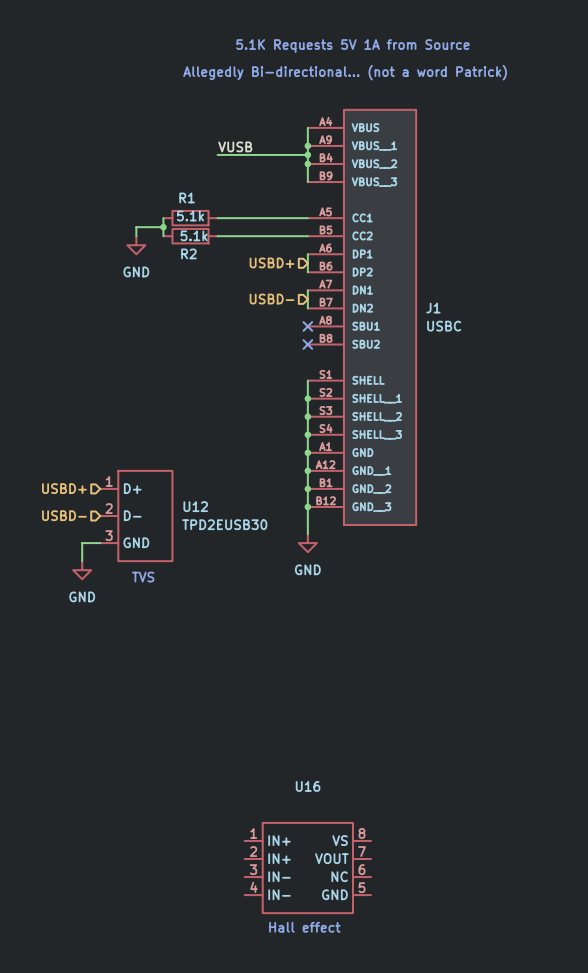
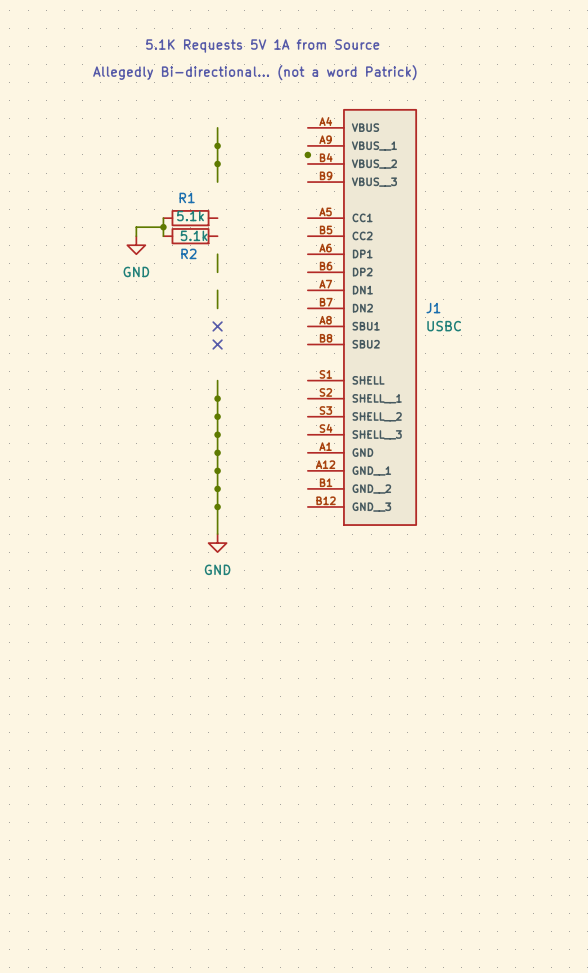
text position: 5.1K Requests 5V 1A from Source (352, 46) -> 5.1K Requests 5V 1A from Source (262, 46)
text position: Allegedly Bi-directional... (not a word Patrick) (345, 72) -> Allegedly Bi-directional... (not a word Patrick) (254, 72)
wire: (307, 127) (307, 182) -> (217, 127) (217, 182)
junction: none -> (217, 145)
junction: (307, 145) -> none
label: VUSB (235, 146) -> none
wire: (217, 154) (307, 154) -> none
junction: none -> (217, 163)
junction: (307, 163) -> none
wire: (217, 218) (307, 218) -> none
wire: (217, 236) (307, 236) -> none
wire: (307, 254) (307, 272) -> (217, 254) (217, 272)
hierarchical label: USBD+ (272, 262) -> none
wire: (307, 290) (307, 308) -> (217, 290) (217, 308)
hierarchical label: USBD- (272, 299) -> none
no-connect mark: none -> (217, 326)
no-connect mark: (307, 326) -> none
no-connect mark: none -> (217, 344)
no-connect mark: (307, 344) -> none
wire: (307, 380) (307, 534) -> (217, 380) (217, 534)
junction: none -> (217, 398)
junction: (307, 398) -> none
junction: none -> (217, 416)
junction: (307, 416) -> none
junction: none -> (217, 434)
junction: (307, 434) -> none
junction: none -> (217, 452)
junction: (307, 452) -> none
junction: none -> (217, 470)
junction: (307, 470) -> none
hierarchical label: USBD+ (64, 488) -> none
junction: none -> (217, 488)
junction: (307, 488) -> none
junction: none -> (217, 506)
junction: (307, 506) -> none
hierarchical label: USBD- (64, 515) -> none
U12: TPD2EUSB30 (136, 516) -> none
wire: (100, 543) (82, 543) (82, 561) -> none
power symbol: none -> GND (217, 543)
power symbol: GND (307, 543) -> none
power symbol: GND (82, 570) -> none
text: TVS (143, 577) -> none
U16: (307, 868) -> none
text: Hall effect (304, 927) -> none

